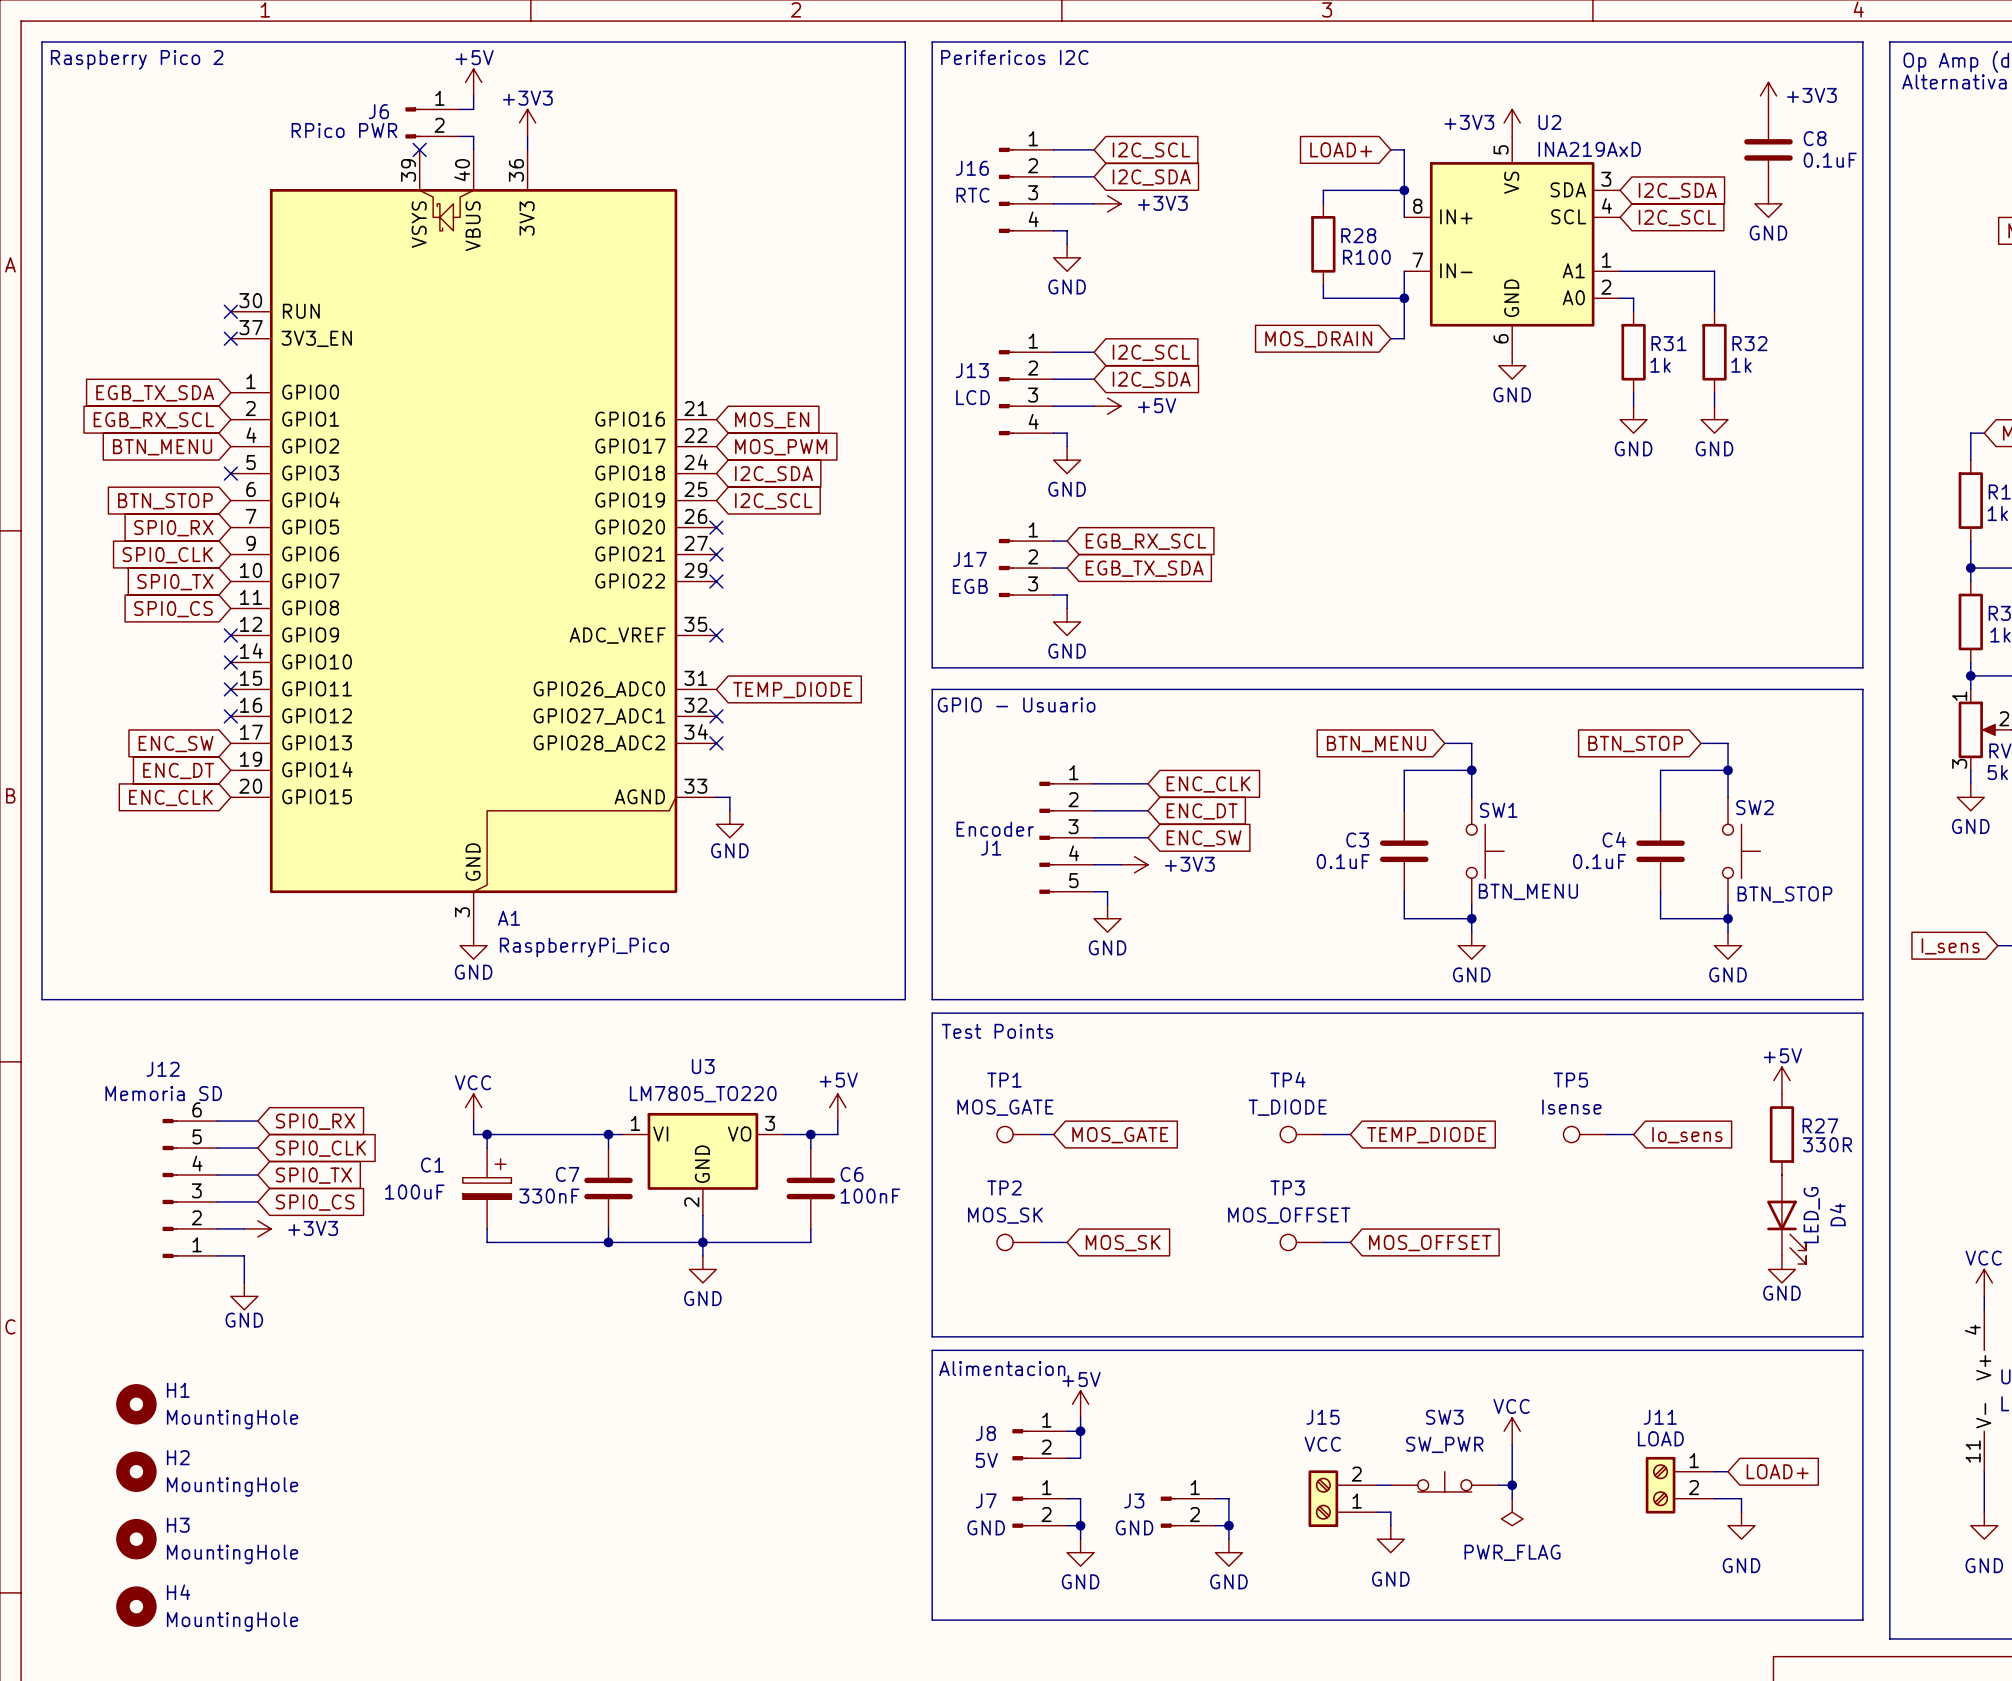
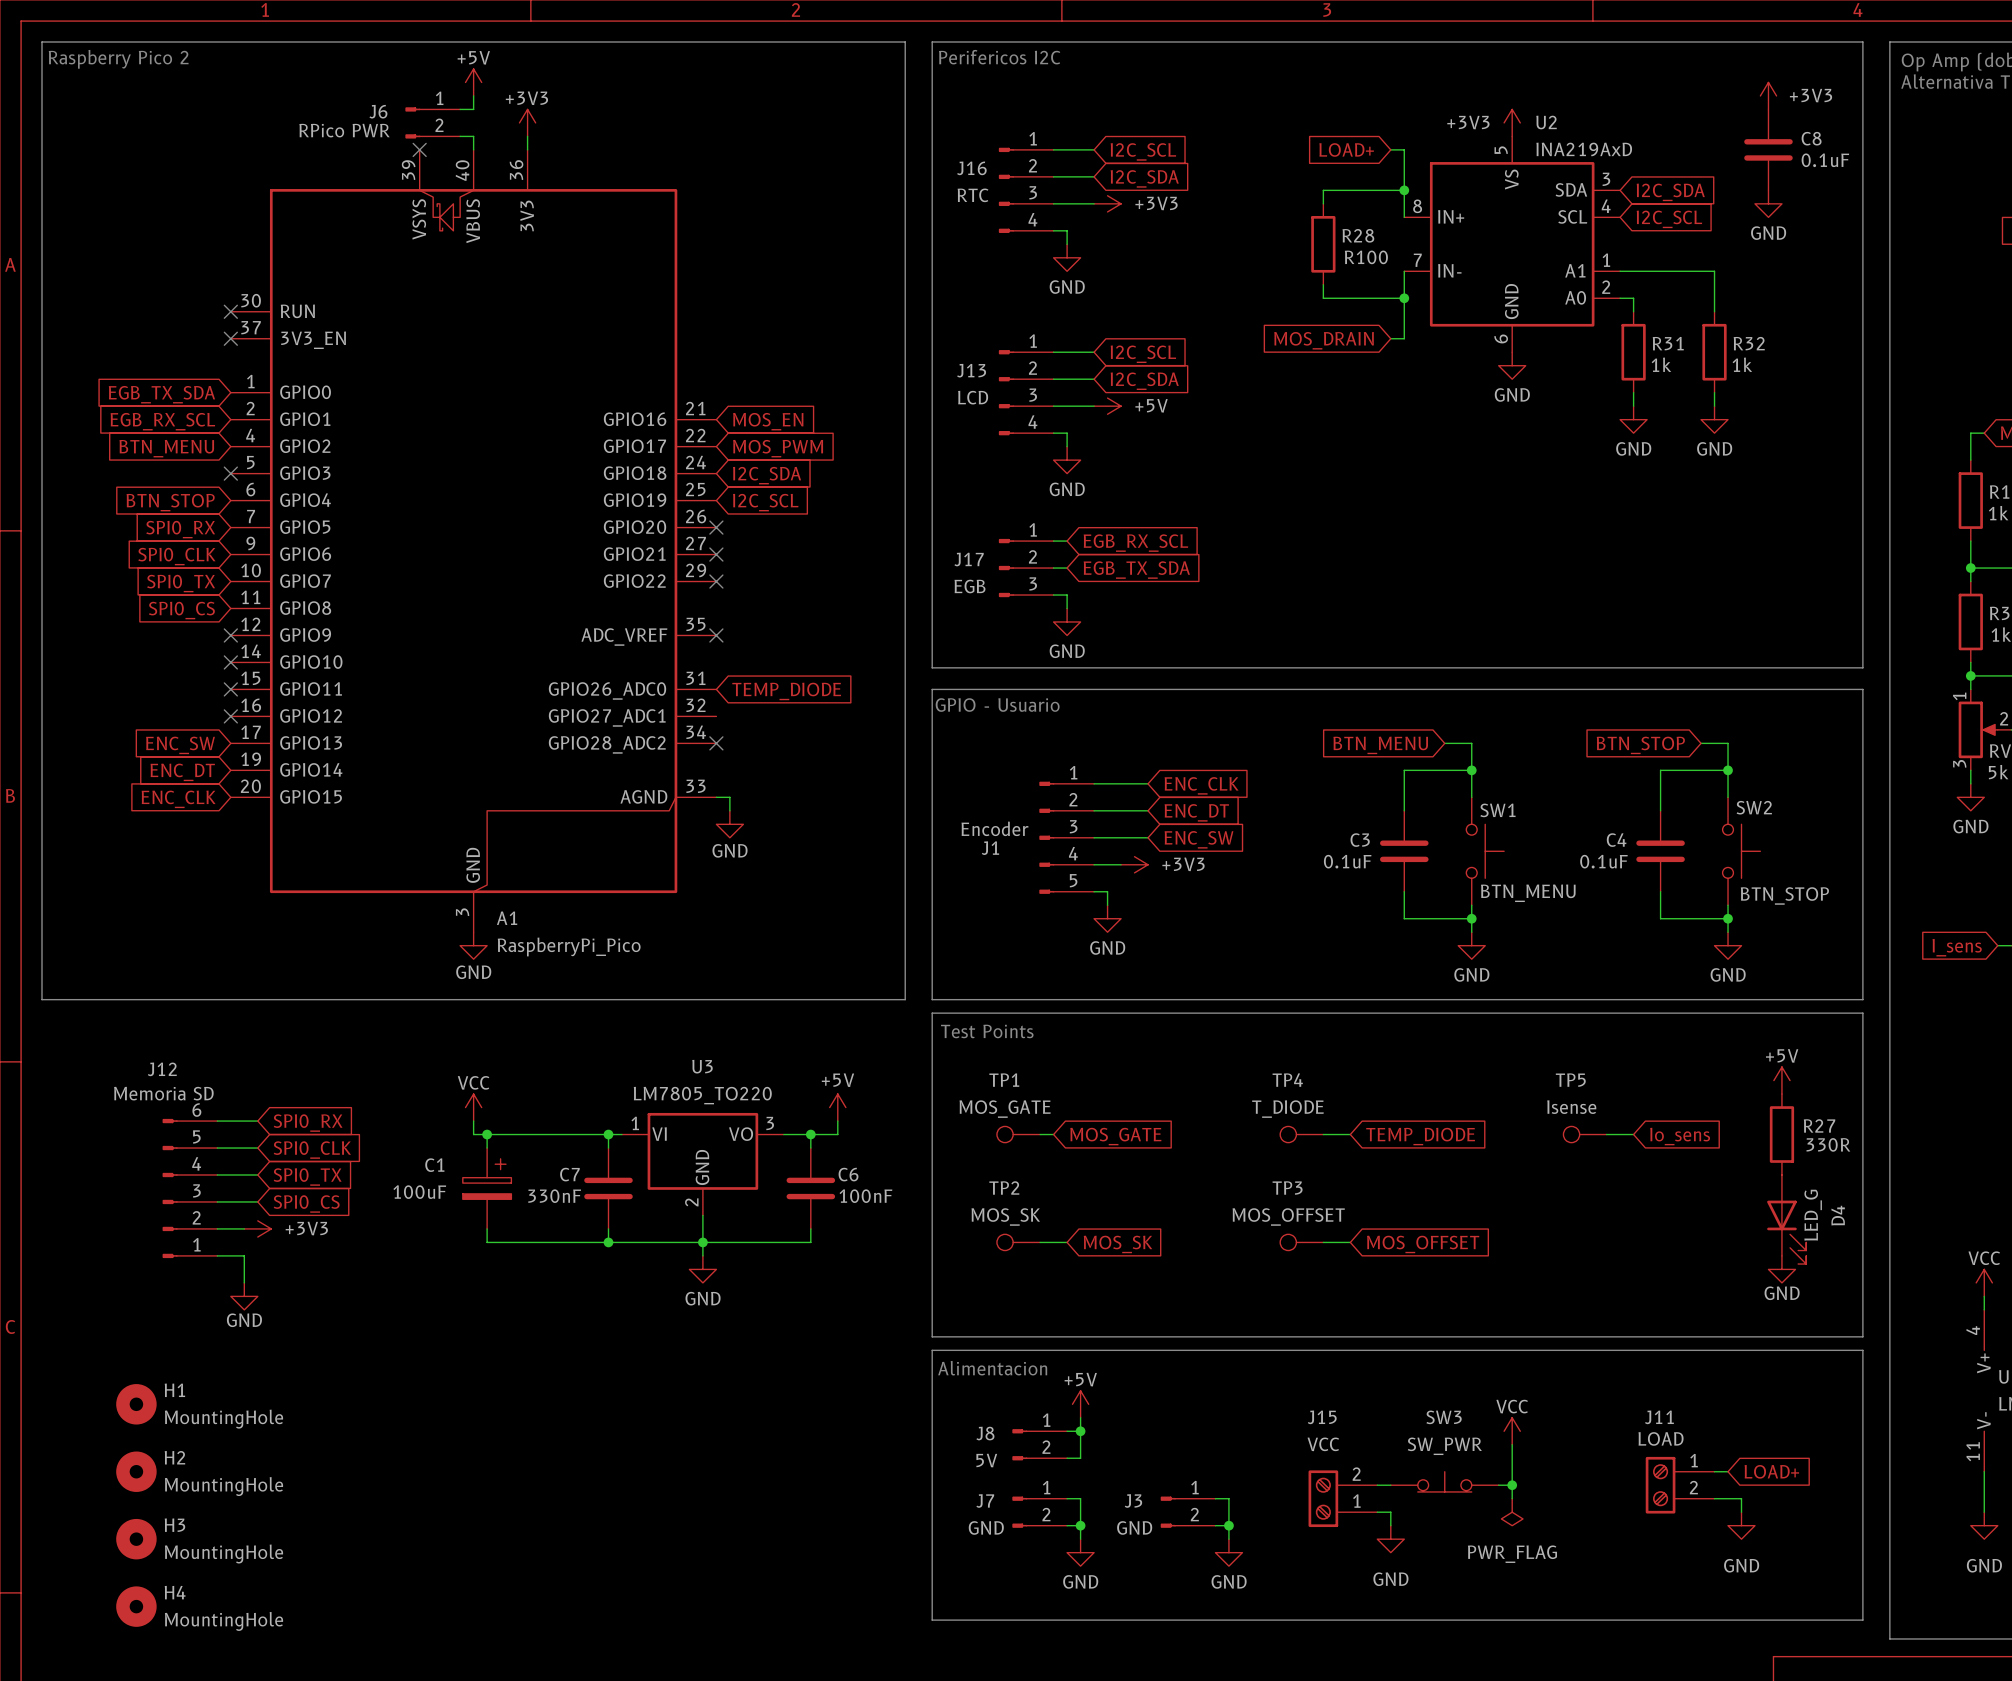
no-connect mark: (716, 716) -> none

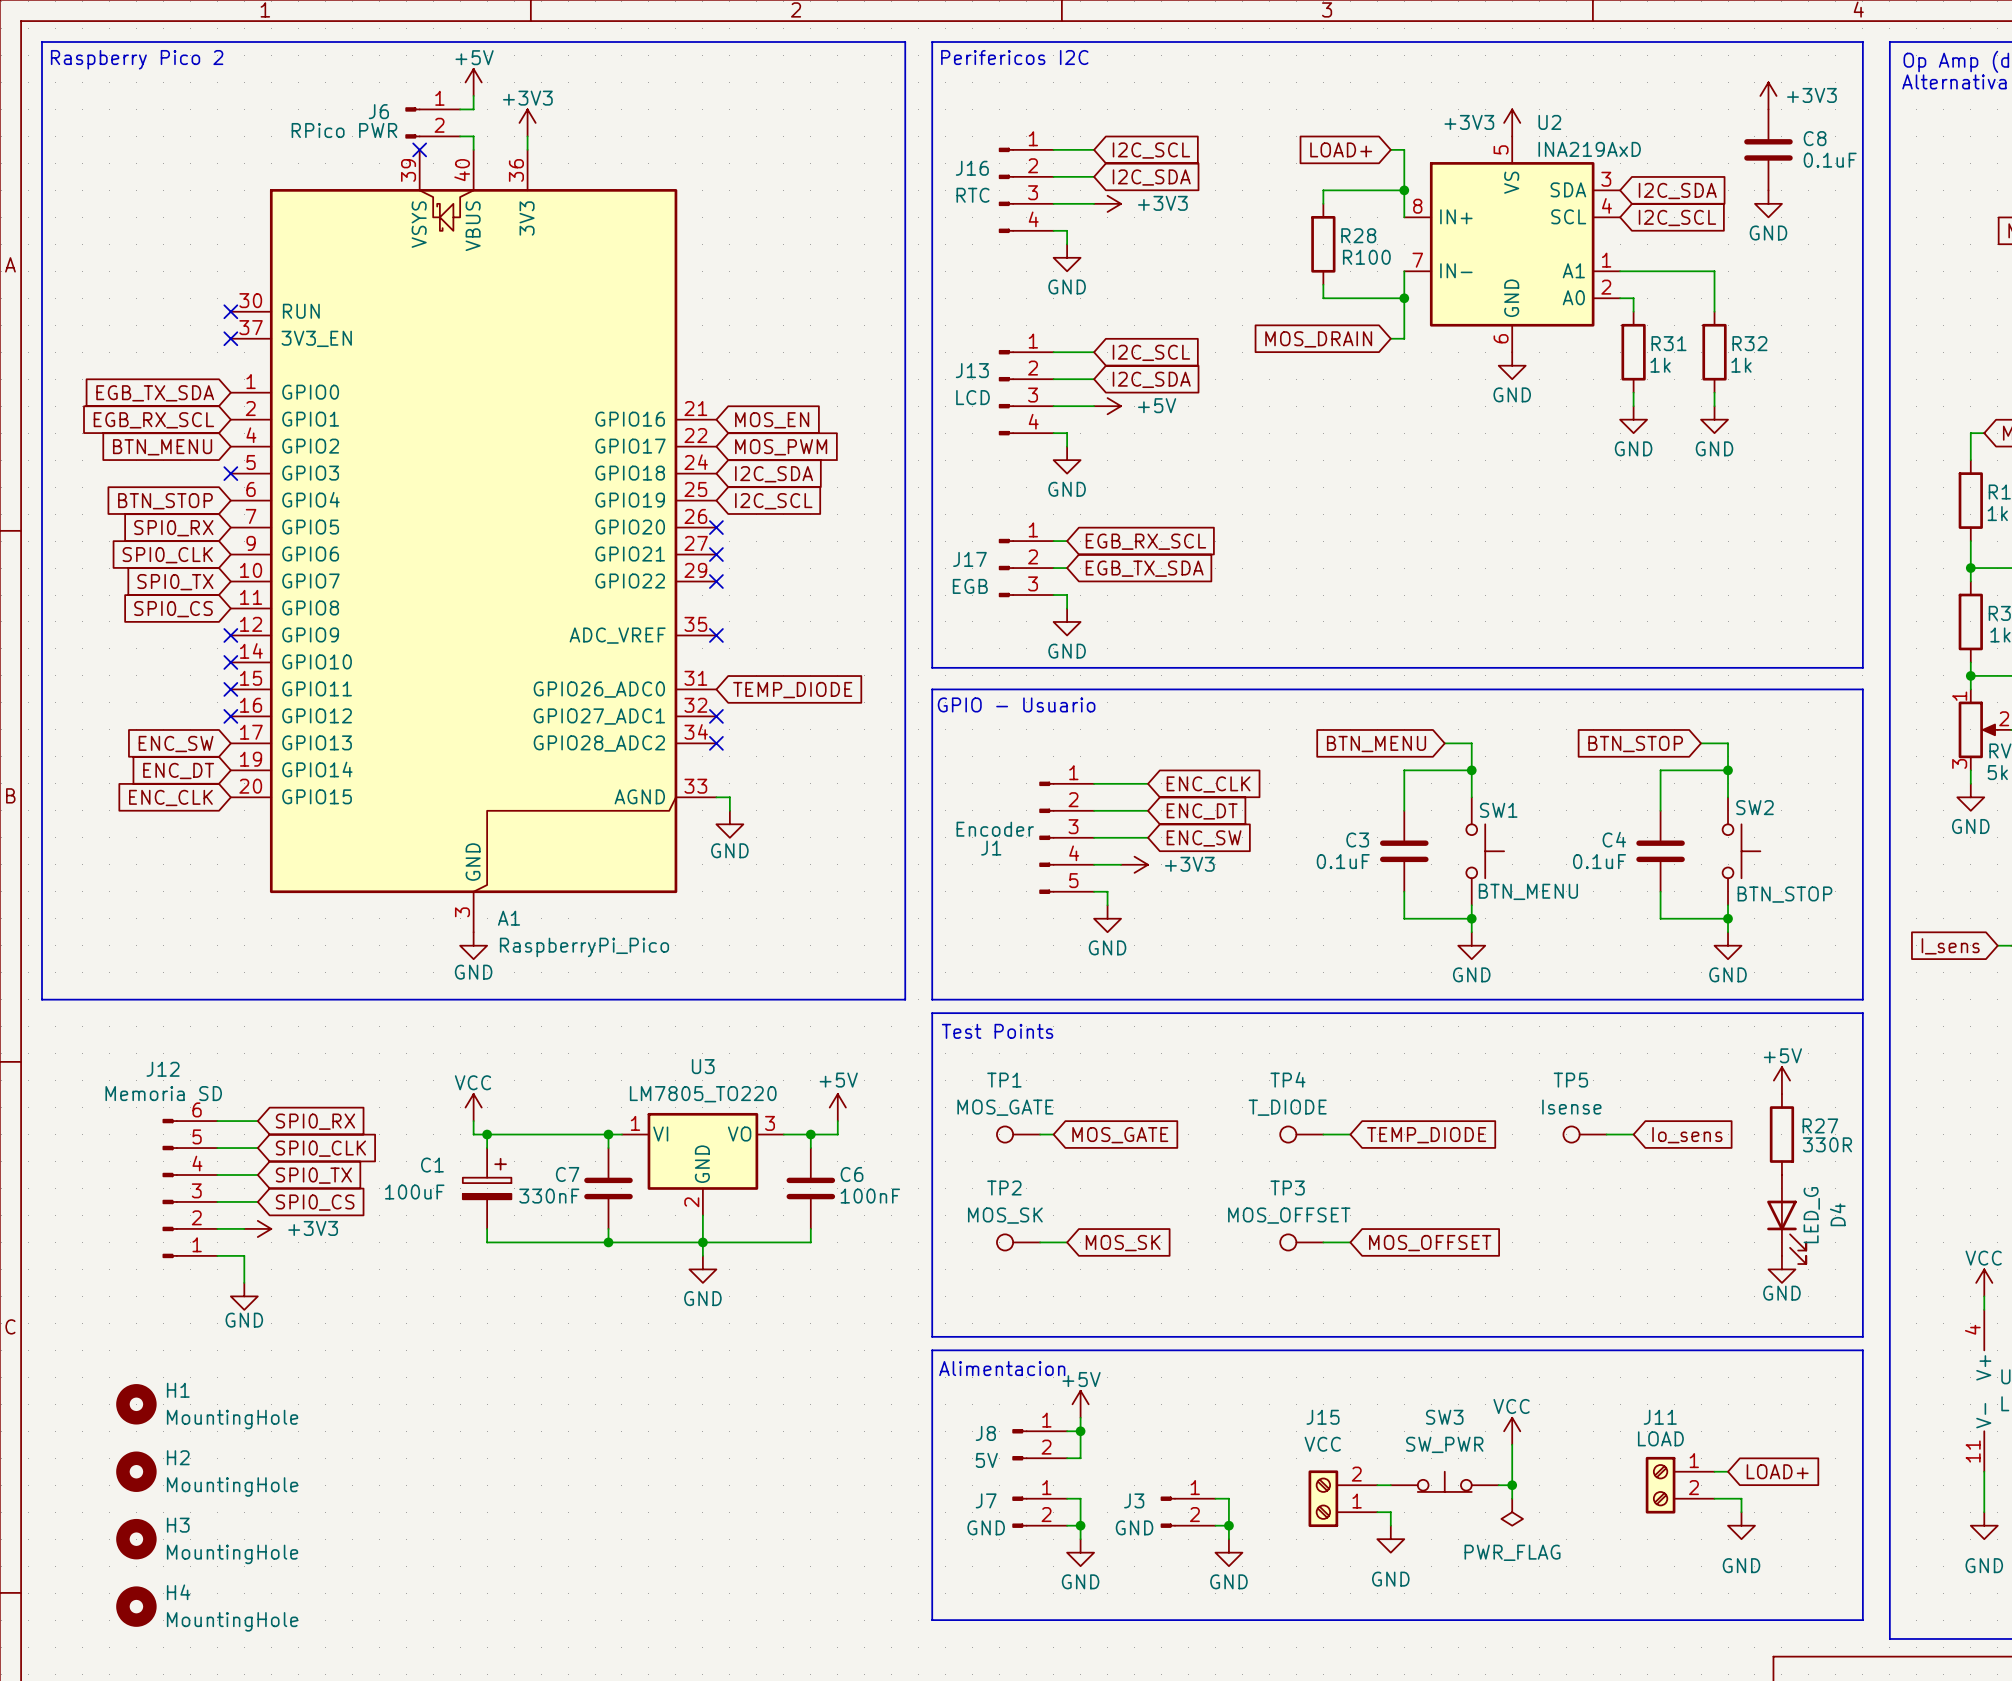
no-connect mark: none -> (716, 716)

